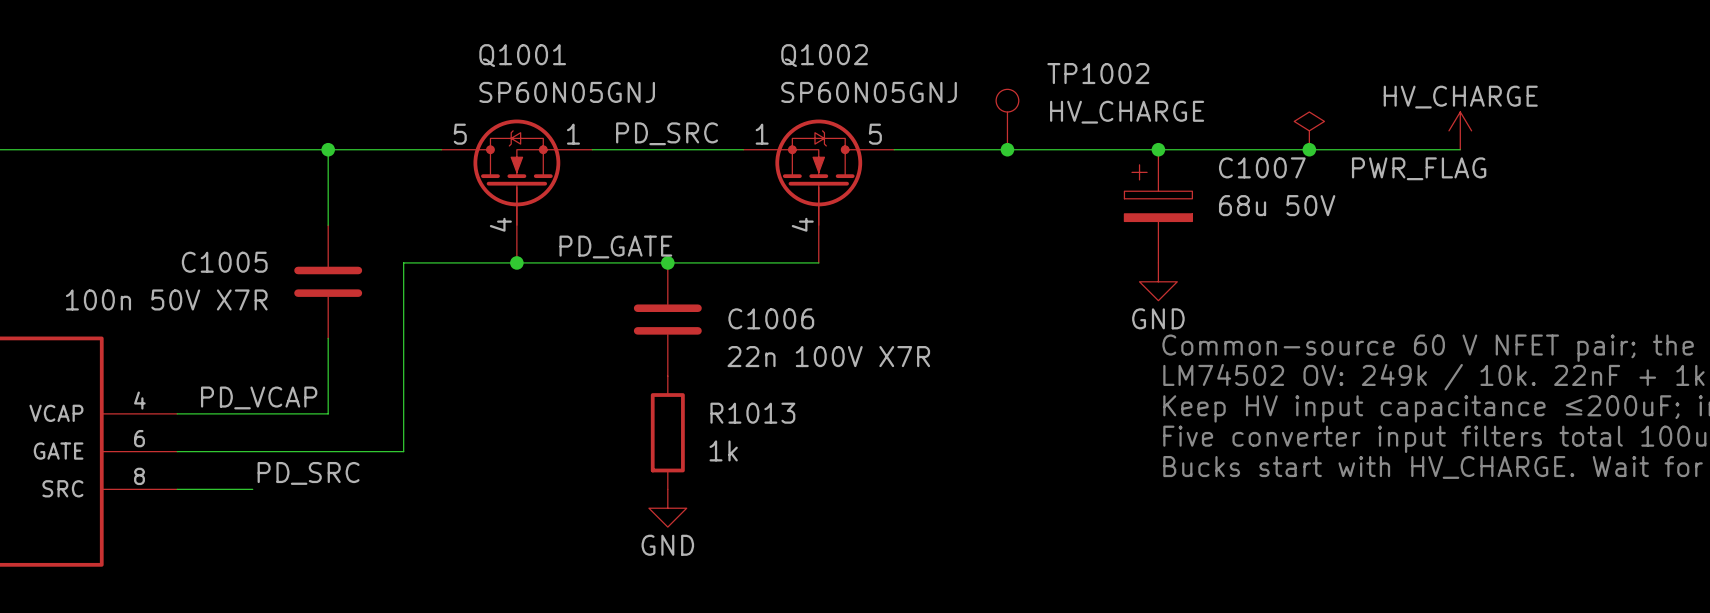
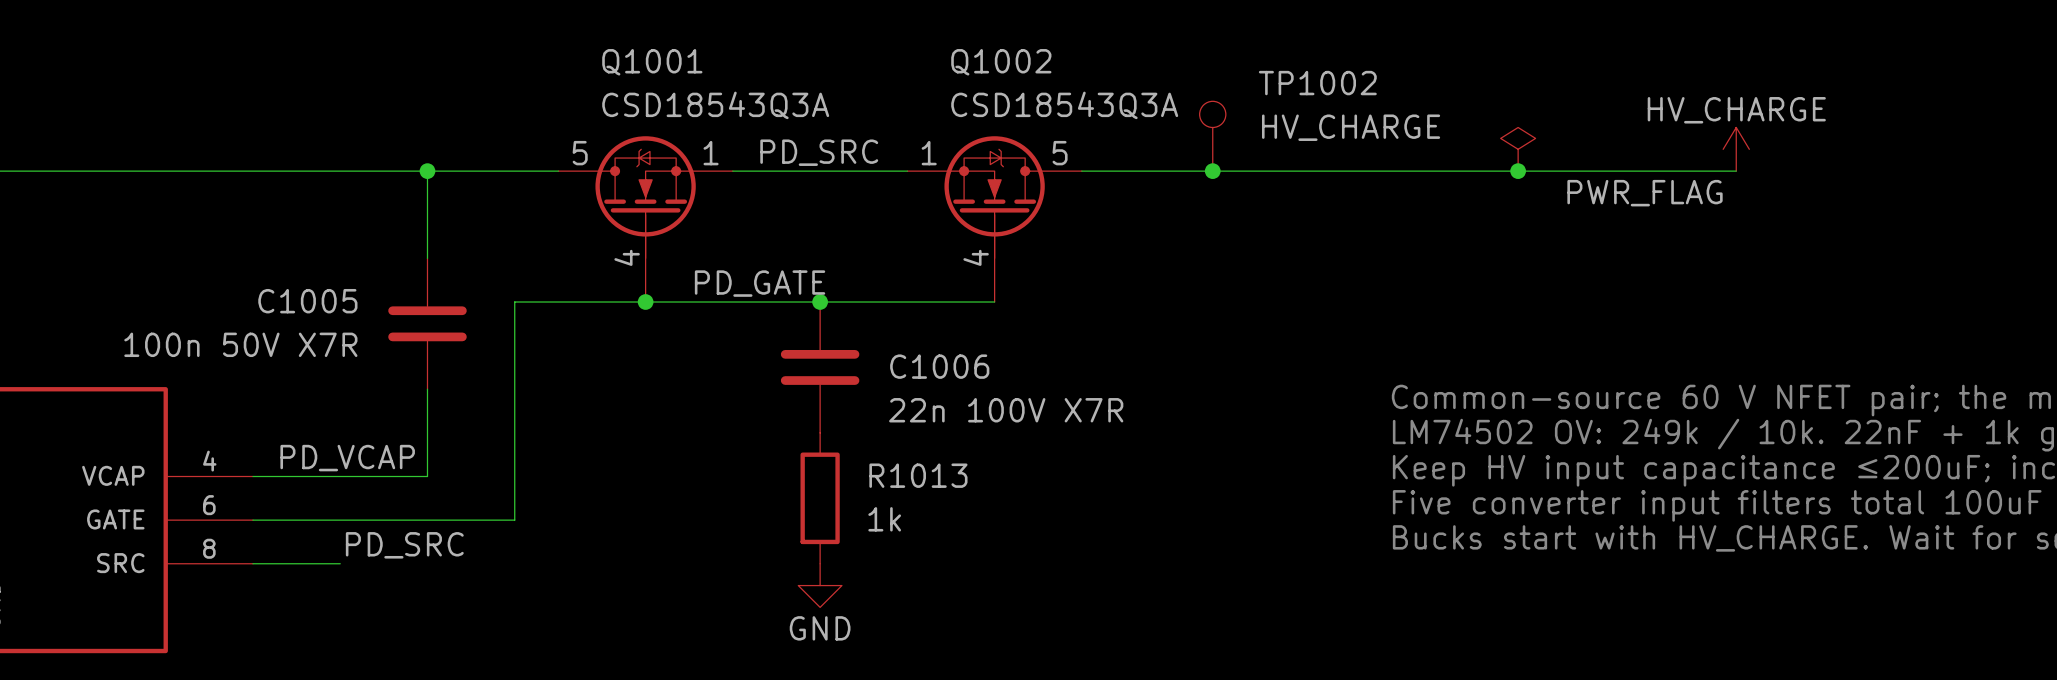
Q1001 value: SP60N05GNJ (567, 92) -> CSD18543Q3A (715, 105)
Q1002 value: SP60N05GNJ (869, 92) -> CSD18543Q3A (1064, 105)
power symbol position: PWR_FLAG (1309, 130) -> PWR_FLAG (1518, 149)
junction: (1158, 149) -> none
junction position: (1309, 149) -> (1518, 171)
C1007: 68u 50V (1158, 206) -> none
power symbol: GND (1158, 281) -> none

